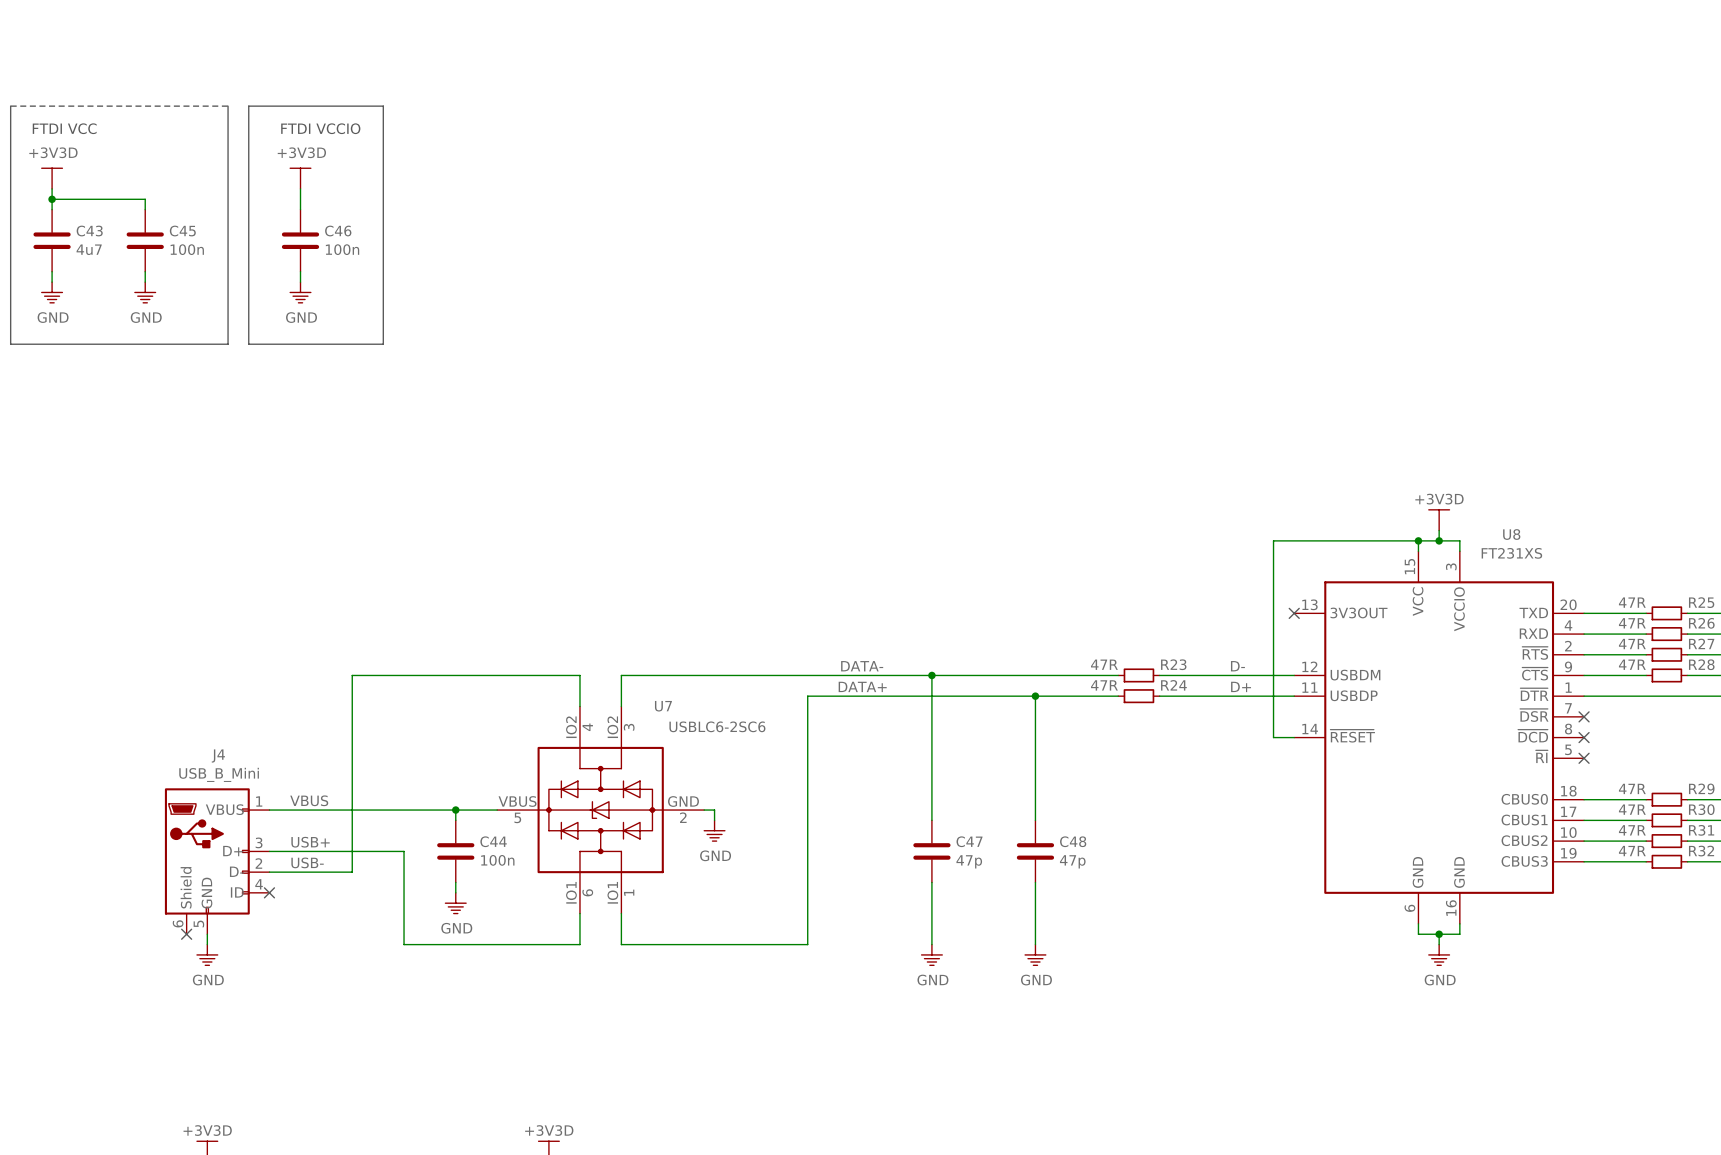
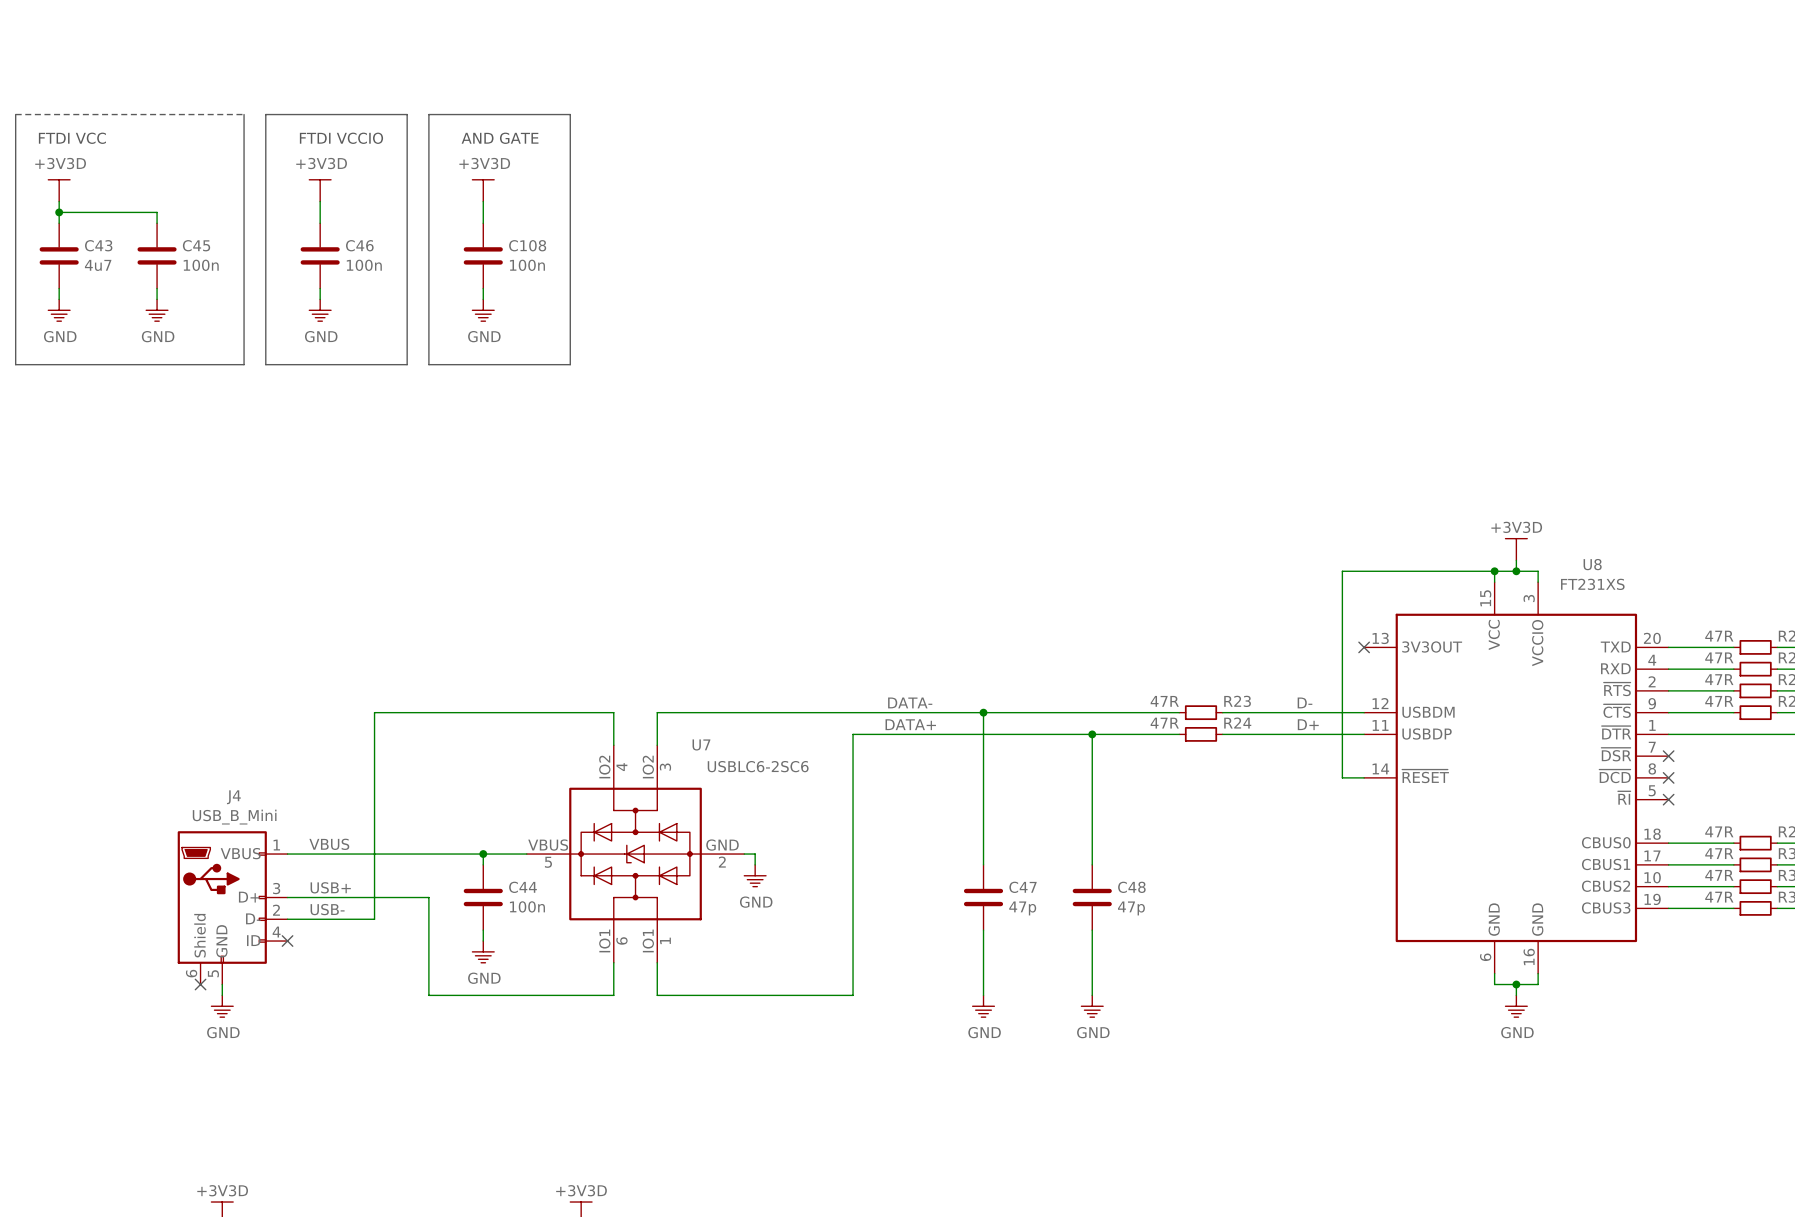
line: none -> (428, 114) (428, 364) (570, 364) (570, 114) (428, 114)
text: none -> AND GATE (500, 138)
power symbol: none -> +3V3D (483, 190)
wire: none -> (483, 201) (483, 223)
C108: none -> 100n (483, 255)
wire: none -> (483, 288) (483, 299)
power symbol: none -> GND (483, 310)

